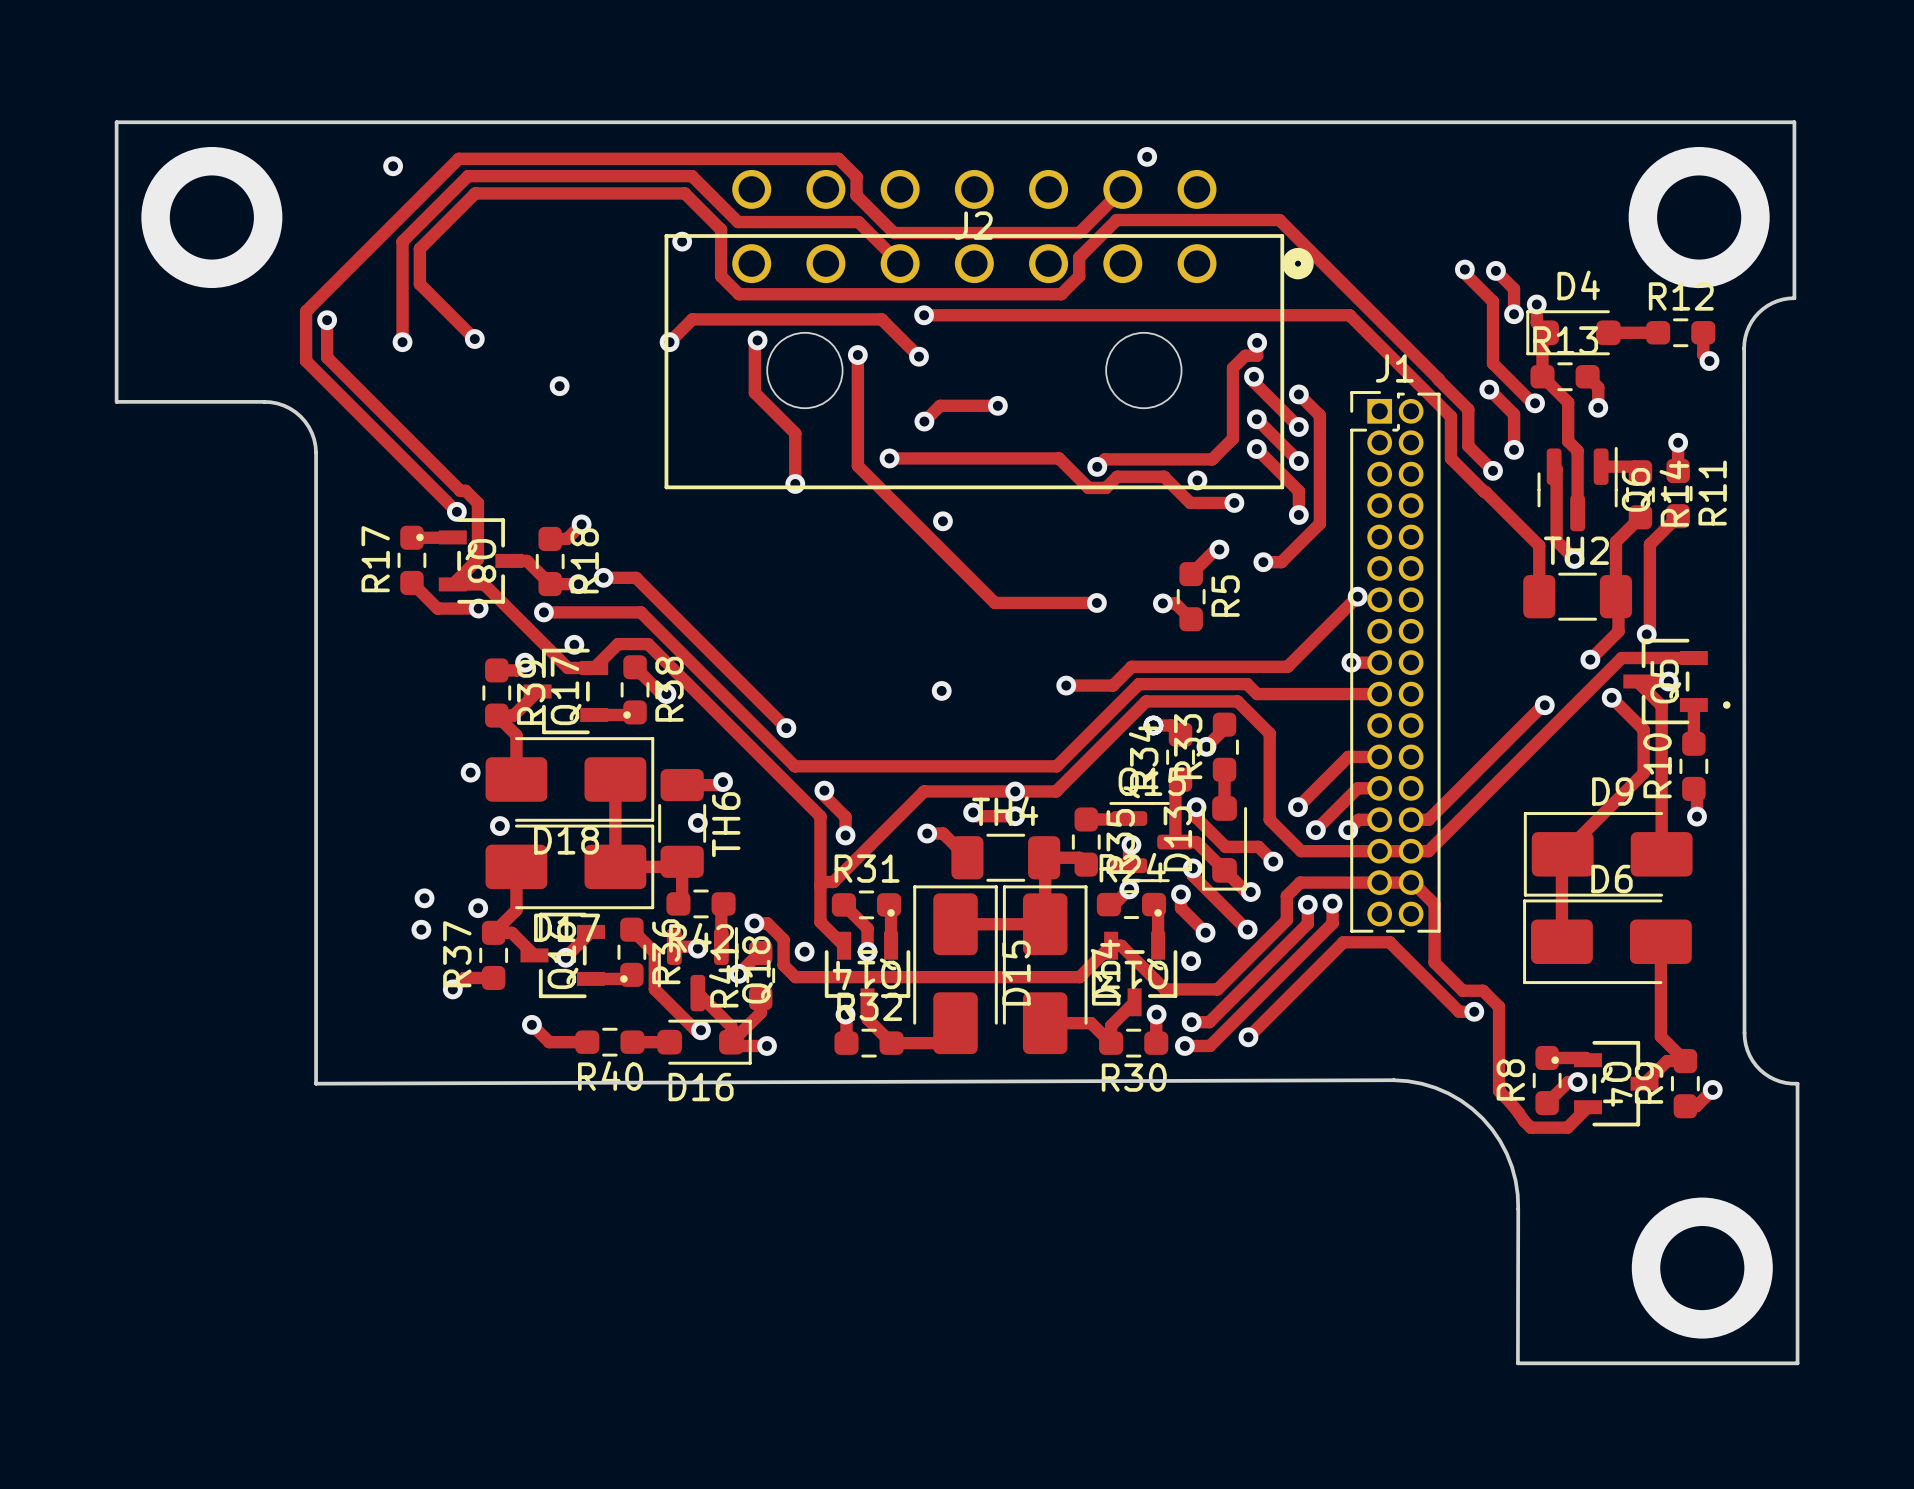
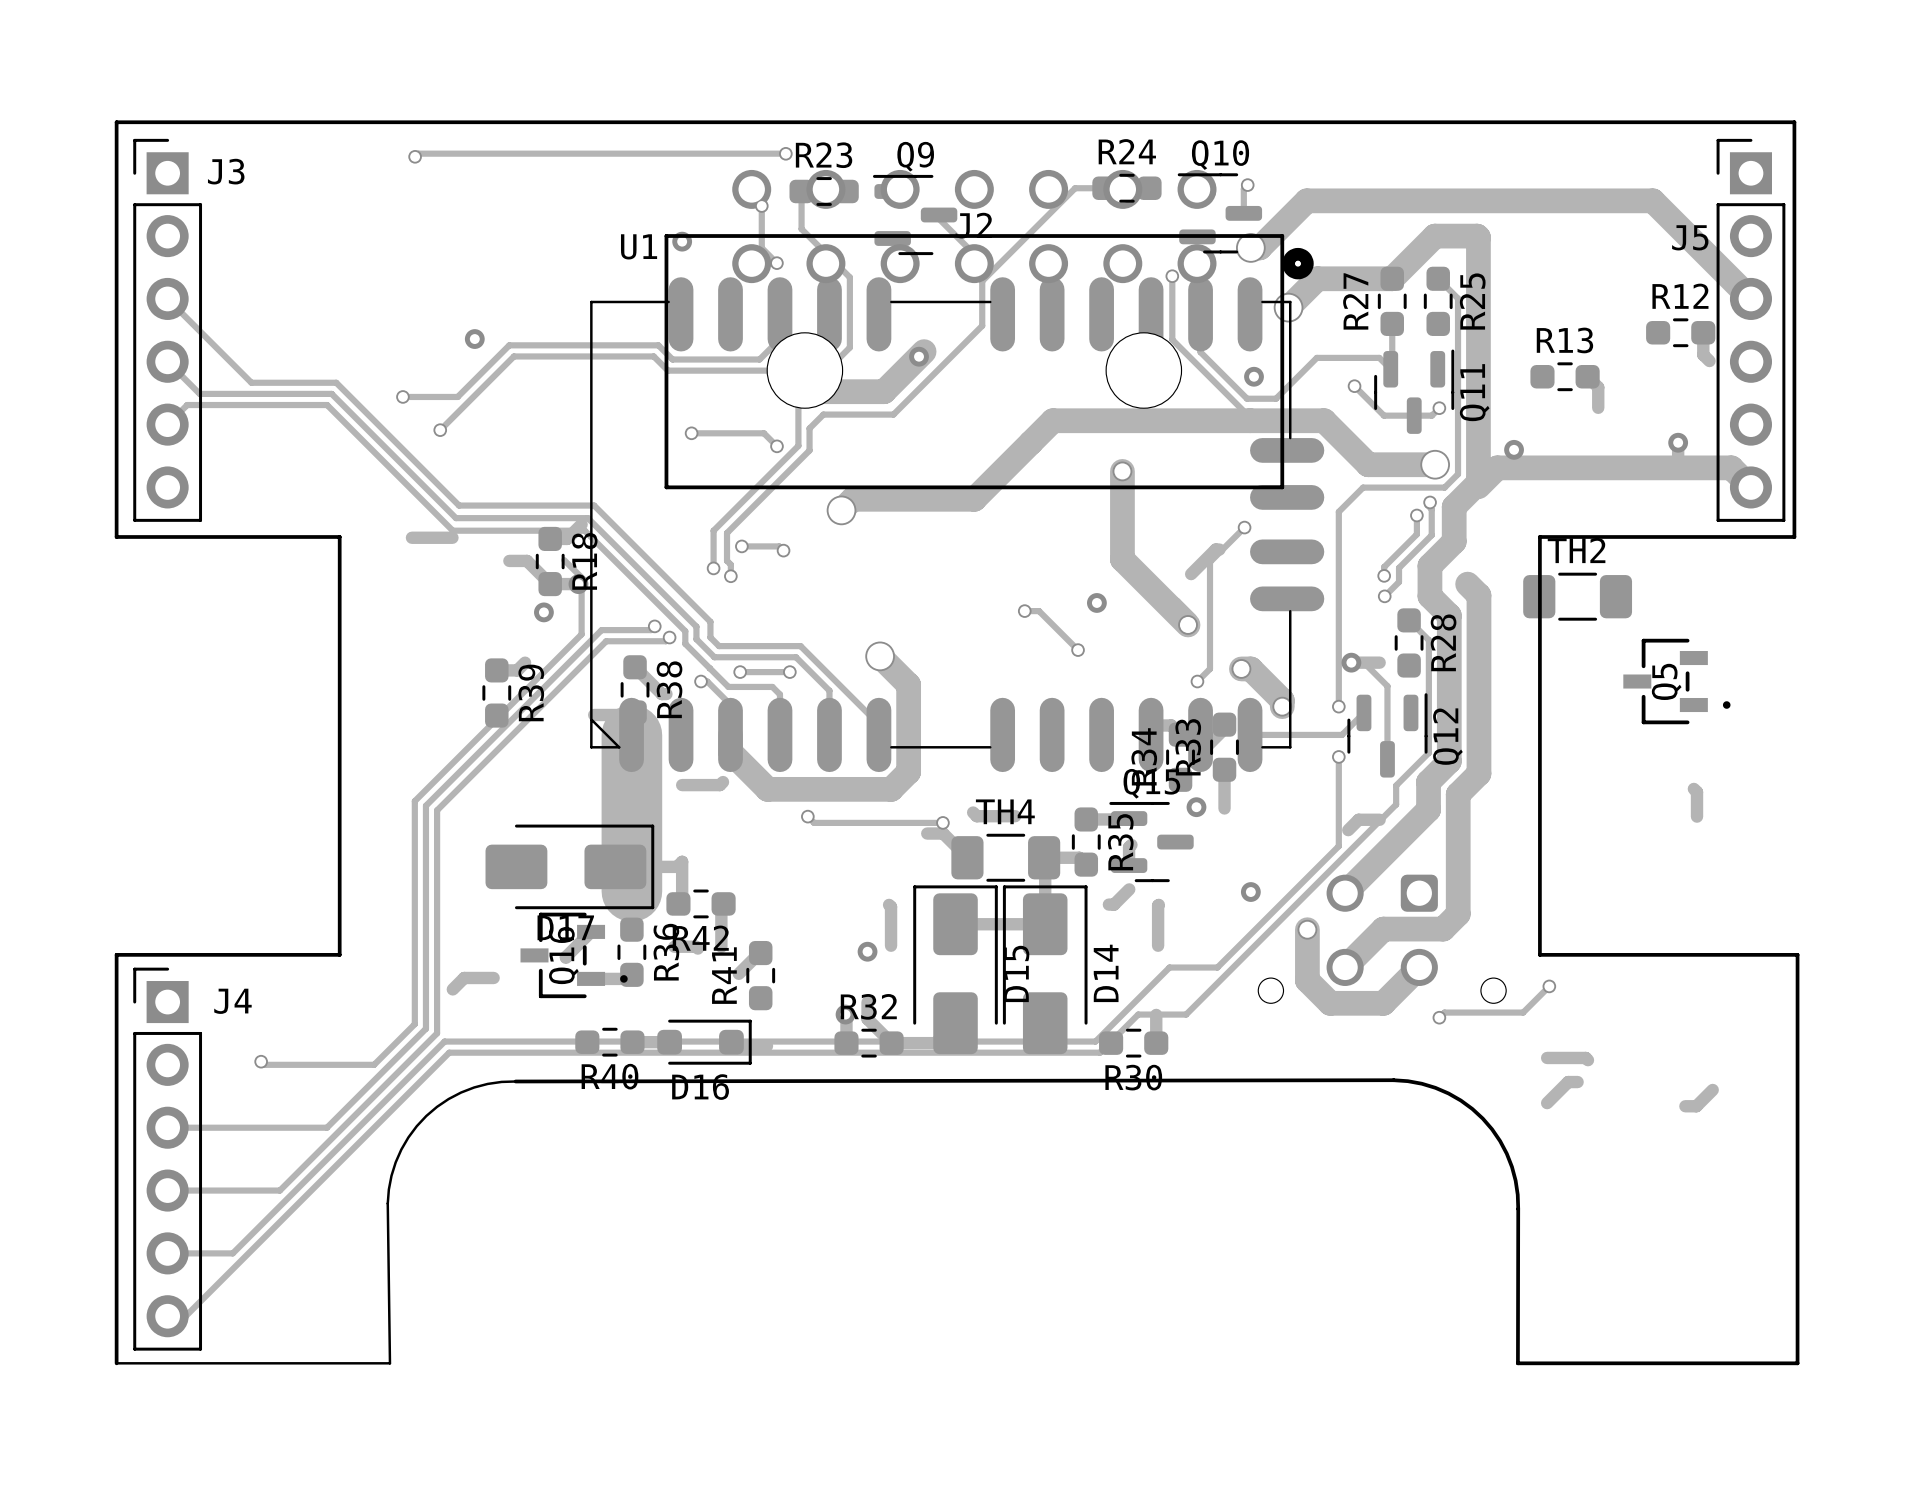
track: none -> (785, 153) (418, 153) (415, 156)
via: none -> (785, 153)
via: none -> (415, 156)
via: (1147, 156) -> none
via: (393, 166) -> none
track: none -> (1247, 185) (1243, 188) (1243, 213)
via: none -> (1247, 185)
track: none -> (1104, 188) (1075, 188) (982, 281) (982, 325) (893, 414) (823, 414) (809, 428) (809, 450) (727, 533) (727, 560) (730, 564) (730, 576)
track: (1122, 189) (1079, 233) (894, 233) (856, 195) (856, 176) (838, 158) (458, 158) (306, 311) (306, 361) (456, 511) -> none
track: none -> (801, 191) (801, 229) (849, 277) (849, 347) (837, 359) (824, 359) (798, 385) (798, 445) (713, 530) (713, 568)
R23: none -> (824, 191)
track: none -> (761, 206) (761, 248) (776, 263)
via: none -> (761, 206)
Q10: none -> (1219, 213)
Q9: none -> (915, 215)
track: none -> (939, 215) (939, 218) (968, 247)
via: (211, 217) -> none
via: (1699, 217) -> none
track: none -> (1250, 247) (1259, 247) (1306, 200) (1652, 200) (1750, 298)
via: none -> (1250, 247)
via: none -> (776, 263)
track: (900, 263) (858, 222) (738, 222) (692, 176) (468, 176) (402, 241) (402, 342) -> none
track: (1464, 269) (1464, 273) (1493, 301) (1493, 363) (1532, 403) (1535, 403) -> none
via: (1464, 269) -> none
track: (1495, 270) (1514, 288) (1514, 314) -> none
via: (1495, 270) -> none
track: none -> (1172, 276) (1172, 339) (1250, 417) (1250, 420)
via: none -> (1172, 276)
track: none -> (1438, 278) (1458, 298) (1458, 474) (1444, 487) (1363, 487) (1338, 511) (1338, 706)
track: none -> (167, 298) (251, 382) (336, 382) (459, 505) (594, 505) (710, 621) (710, 637) (719, 646) (800, 646) (878, 724) (878, 734)
board edge: (1794, 298) (1777, 300) (1762, 309) (1751, 321) (1744, 342) (1744, 1033) (1747, 1050) (1760, 1069) (1774, 1079) (1797, 1083) -> (1794, 298) (1794, 536) (1539, 536) (1539, 954) (1797, 954) (1797, 1083)
R27: none -> (1392, 301)
R25: none -> (1438, 301)
track: (1536, 304) (1536, 322) (1546, 332) (1542, 336) (1542, 376) (1568, 402) (1568, 441) (1577, 450) (1577, 513) -> none
via: (1536, 304) -> none
track: none -> (1288, 307) (1317, 278) (1392, 278) (1434, 236) (1478, 237) (1478, 482) (1454, 506) (1454, 541) (1429, 565) (1429, 596) (1449, 615) (1449, 761) (1428, 782) (1428, 809) (1345, 893)
via: none -> (1288, 307)
track: none -> (779, 314) (779, 339) (759, 359) (672, 359) (658, 345) (509, 345) (457, 396) (402, 396)
track: none -> (829, 314) (829, 339) (797, 370) (667, 370) (653, 356) (513, 356) (440, 430)
track: none -> (1200, 314) (1200, 352) (1247, 398) (1275, 398) (1316, 357) (1379, 357) (1390, 369) (1392, 323)
via: (1514, 314) -> none
track: (924, 315) (1349, 315) (1450, 416) (1450, 458) (1539, 545) (1539, 596) -> none
via: (924, 315) -> none
track: (327, 320) (327, 357) (460, 490) (465, 490) (477, 503) (477, 559) (452, 584) (484, 584) (567, 667) (594, 667) (618, 644) (648, 644) (820, 816) (820, 922) (844, 945) -> none
via: (327, 320) -> none
J3: none -> (167, 330)
J5: none -> (1750, 330)
D4: (1573, 332) -> none
track: (1608, 332) (1658, 332) -> none
track: (474, 339) (419, 284) (419, 248) (475, 193) (684, 193) (721, 229) (721, 276) (739, 294) (1061, 294) (1079, 276) (1079, 257) (1116, 220) (1279, 220) (1468, 409) (1468, 446) (1493, 470) -> none
track: (757, 340) (754, 343) (754, 392) (795, 433) (795, 483) -> none
via: (757, 340) -> none
via: (402, 342) -> none
track: (669, 342) (692, 319) (881, 319) (919, 356) -> none
via: (669, 342) -> none
track: (1257, 342) (1257, 355) (1245, 355) (1232, 368) (1232, 438) (1212, 459) (1104, 459) (1097, 466) -> none
via: (1257, 342) -> none
track: none -> (924, 351) (884, 391) (824, 391)
track: (857, 355) (857, 465) (994, 602) (1096, 602) -> none
via: (857, 355) -> none
track: none -> (167, 361) (199, 393) (331, 393) (455, 518) (587, 518) (696, 626) (696, 639) (714, 657) (796, 657) (829, 690) (829, 734)
via: (1709, 361) -> none
track: (1254, 376) (1254, 382) (1298, 427) -> none
via: (559, 386) -> none
track: none -> (1354, 386) (1384, 415) (1431, 415) (1439, 408)
via: none -> (1354, 386)
track: (1489, 389) (1514, 414) (1514, 449) -> none
via: (1489, 389) -> none
Q11: none -> (1414, 391)
track: (1298, 394) (1319, 415) (1319, 523) (1281, 562) (1263, 562) -> none
via: (1298, 394) -> none
via: none -> (402, 396)
board edge: (116, 401) (270, 402) (283, 405) (300, 416) (308, 427) (314, 439) (316, 452) (316, 1083) (1393, 1080) -> (116, 401) (116, 536) (339, 536) (339, 954) (116, 954) (116, 1363) (389, 1363) (387, 1203) (391, 1175) (395, 1162) (408, 1137) (426, 1115) (437, 1106) (461, 1092) (487, 1083) (515, 1081) (1393, 1080)
via: (1535, 403) -> none
track: (997, 405) (940, 405) (924, 421) -> none
via: (997, 405) -> none
via: (1598, 407) -> none
via: none -> (1439, 408)
track: (1256, 419) (1298, 461) -> none
via: (1256, 419) -> none
via: (924, 421) -> none
track: none -> (167, 424) (187, 405) (327, 405) (452, 530) (584, 530) (685, 631) (685, 643) (728, 686) (772, 686) (779, 694) (779, 734)
via: (1298, 427) -> none
via: none -> (440, 430)
track: none -> (691, 433) (763, 433) (776, 446)
via: none -> (691, 433)
via: none -> (776, 446)
track: (1256, 449) (1298, 491) (1298, 514) -> none
via: (1256, 449) -> none
track: (889, 458) (1059, 458) (1088, 487) (1105, 487) (1117, 476) (1163, 476) (1190, 502) (1234, 502) -> none
via: (889, 458) -> none
via: (1298, 461) -> none
track: none -> (1435, 464) (1368, 464) (1324, 420) (1052, 420) (974, 499) (852, 499) (841, 510)
via: none -> (1435, 464)
via: (1097, 466) -> none
track: (1554, 466) (1556, 469) (1556, 541) (1574, 558) -> none
via: (1493, 470) -> none
track: none -> (1122, 471) (1122, 559) (1188, 624)
via: none -> (1122, 471)
via: (1197, 480) -> none
via: (795, 483) -> none
track: none -> (1478, 486) (1497, 467) (1731, 467) (1750, 487)
Q6: (1577, 489) -> none
R11: (1678, 493) -> none
R14: (1640, 494) -> none
via: (1234, 502) -> none
track: none -> (1430, 502) (1427, 505) (1431, 509) (1431, 535) (1399, 567) (1399, 582) (1384, 596)
via: none -> (1430, 502)
via: none -> (841, 510)
via: (456, 511) -> none
via: (1298, 514) -> none
track: none -> (1416, 515) (1416, 534) (1384, 567) (1384, 575)
via: none -> (1416, 515)
track: (1678, 516) (1649, 544) (1649, 631) (1646, 634) -> none
track: (1640, 517) (1615, 541) (1615, 596) (1618, 599) (1618, 631) (1590, 659) -> none
via: (942, 521) -> none
via: (581, 524) -> none
U1: none -> (957, 524)
track: none -> (1244, 527) (1210, 562) (1210, 668) (1197, 681)
via: none -> (1244, 527)
track: none -> (741, 546) (779, 546) (783, 550)
via: none -> (741, 546)
via: (1219, 549) -> none
via: none -> (783, 550)
via: (1574, 558) -> none
R17: (411, 560) -> none
Q8: (469, 560) -> none
track: none -> (564, 560) (581, 577) (581, 634) (414, 801) (414, 1024) (374, 1064) (264, 1064) (261, 1061)
via: (1263, 562) -> none
via: none -> (713, 568)
via: none -> (1384, 575)
via: none -> (730, 576)
track: (603, 577) (636, 577) (786, 728) -> none
via: (603, 577) -> none
track: (411, 582) (437, 608) (478, 608) -> none
track: none -> (1467, 584) (1478, 595) (1478, 773) (1458, 794) (1458, 914) (1443, 929) (1383, 929) (1345, 967)
R5: (1191, 596) -> none
track: (1357, 596) (1287, 666) (1131, 666) (1112, 685) (1066, 685) -> none
via: (1357, 596) -> none
via: none -> (1384, 596)
via: (1162, 603) -> none
via: (478, 608) -> none
track: none -> (1024, 611) (1039, 611) (1078, 650)
via: none -> (1024, 611)
track: (543, 612) (640, 612) (794, 766) (1056, 766) (1138, 684) (1247, 684) (1257, 694) (1379, 694) -> none
track: none -> (1409, 620) (1428, 640) (1428, 752) (1396, 785) (1396, 804) (1186, 1014) (1138, 1014) (1100, 1052) (449, 1052) (185, 1316) (167, 1316)
via: none -> (1188, 624)
track: none -> (654, 626) (651, 630) (601, 630) (425, 805) (425, 1028) (326, 1127) (167, 1127)
via: none -> (654, 626)
via: (1646, 634) -> none
track: none -> (669, 637) (665, 641) (606, 641) (437, 810) (437, 1033) (279, 1190) (167, 1190)
via: none -> (669, 637)
R28: none -> (1409, 642)
via: (574, 644) -> none
via: none -> (1078, 650)
track: none -> (880, 656) (908, 684) (908, 771) (891, 789) (767, 789) (730, 752) (730, 704) (707, 681) (701, 681)
via: none -> (880, 656)
track: (1693, 658) (1621, 658) (1428, 851) (1301, 851) (1269, 819) (1269, 733) (1237, 701) (1146, 701) (1056, 791) (924, 791) (833, 882) (824, 882) (820, 885) -> none
via: (1590, 659) -> none
J1: (1395, 661) -> none
via: (525, 662) -> none
track: none -> (1367, 665) (1387, 686) (1387, 759)
track: none -> (1241, 668) (1250, 668) (1282, 700) (1282, 706)
via: none -> (1241, 668)
track: none -> (740, 672) (789, 672)
via: none -> (740, 672)
via: none -> (789, 672)
via: none -> (701, 681)
via: none -> (1197, 681)
track: (1668, 681) (1637, 681) (1661, 705) (1661, 854) -> none
via: (1668, 681) -> none
via: (1066, 685) -> none
via: (941, 690) -> none
track: (537, 691) (513, 715) (496, 715) (516, 735) (516, 779) -> none
Q17: (577, 691) -> none
via: (666, 694) -> none
track: (1611, 697) (1643, 729) (1643, 773) (1561, 855) (1561, 941) -> none
via: (1611, 697) -> none
track: (1544, 705) (1428, 819) (1411, 819) -> none
via: (1544, 705) -> none
track: (1693, 705) (1693, 743) -> none
via: none -> (1282, 706)
via: none -> (1338, 706)
track: none -> (1363, 712) (1341, 734) (1250, 734)
via: (1153, 725) -> none
via: (786, 728) -> none
track: none -> (631, 735) (631, 891)
Q12: none -> (1387, 735)
via: (1206, 746) -> none
track: none -> (1338, 756) (1338, 846) (1217, 967) (1169, 967) (1095, 1041) (444, 1041) (232, 1253) (167, 1253)
via: none -> (1338, 756)
track: (1379, 756) (1348, 756) (1297, 807) -> none
R10: (1693, 766) -> none
via: (470, 772) -> none
D18: (569, 779) -> none
track: (1180, 779) (1175, 784) (1175, 842) (1196, 842) (1246, 892) (1250, 892) -> none
via: (723, 782) -> none
track: (1379, 788) (1357, 788) (1315, 830) -> none
track: (824, 790) (824, 795) (845, 817) (845, 835) -> none
via: (824, 790) -> none
via: (1015, 791) -> none
track: (1196, 807) (1196, 817) (1225, 846) (1258, 846) (1273, 861) -> none
via: (1297, 807) -> none
via: (973, 812) -> none
track: none -> (807, 816) (814, 822) (942, 822)
via: none -> (807, 816)
via: (1015, 816) -> none
via: (1697, 816) -> none
via: (697, 822) -> none
TH6: (682, 823) -> none
via: (499, 826) -> none
via: (1315, 830) -> none
via: (1348, 830) -> none
via position: (927, 833) -> (942, 822)
via: (845, 835) -> none
D13: (1224, 843) -> none
via: (1131, 844) -> none
D9: (1608, 854) -> none
via: (1273, 861) -> none
track: (516, 866) (516, 910) (493, 932) (511, 932) (534, 955) -> none
track: (1192, 868) (1192, 875) (1247, 929) -> none
via: (1192, 868) -> none
via: (1129, 889) -> none
track: (1181, 894) (1181, 908) (1205, 932) -> none
via: (1181, 894) -> none
via: (424, 898) -> none
track: (1332, 903) (1332, 923) (1210, 1045) (1184, 1045) -> none
via: (1332, 903) -> none
track: (843, 904) (867, 928) (867, 951) -> none
R31: (866, 904) -> none
R24 position: (1131, 904) -> (1126, 188)
track: (1307, 904) (1307, 923) (1209, 1022) (1191, 1022) -> none
via: (1307, 904) -> none
via: (478, 908) -> none
track: (754, 923) (767, 923) (783, 939) (783, 965) (795, 977) (1079, 977) (1111, 945) (1121, 945) (1165, 989) (1217, 989) (1286, 920) (1286, 896) (1300, 882) (1412, 882) (1434, 904) (1434, 962) (1462, 990) (1482, 990) (1499, 1006) (1499, 1091) (1530, 1127) (1567, 1127) (1587, 1107) -> none
via: (754, 923) -> none
via: (421, 929) -> none
track: (631, 929) (654, 952) (654, 989) (695, 1030) (701, 1030) -> none
via: (1247, 929) -> none
track: none -> (1307, 929) (1307, 980) (1330, 1003) (1383, 1003) (1419, 967)
via: none -> (1307, 929)
via: (1205, 932) -> none
part: none -> (1382, 938)
D6: (1607, 941) -> none
track: (1660, 941) (1660, 1036) (1685, 1061) (1667, 1061) (1644, 1083) -> none
via: (697, 948) -> none
via: (804, 951) -> none
R37: (493, 955) -> none
via: (565, 957) -> none
via: (1191, 961) -> none
Q14: (867, 962) -> none
Q13: (1134, 962) -> none
Q18: (697, 969) -> none
via: (738, 973) -> none
track: none -> (1549, 986) (1523, 1012) (1444, 1012) (1439, 1017)
via: none -> (1549, 986)
via: (452, 989) -> none
track: (697, 993) (731, 1026) (731, 1042) (760, 1012) (760, 998) -> none
track: (1134, 1002) (1111, 1025) (1111, 1043) (1091, 1023) (1045, 1023) -> none
track: (1474, 1011) (1459, 1011) (1389, 942) (1343, 942) (1248, 1037) -> none
via: (1474, 1011) -> none
via: (1156, 1014) -> none
via: none -> (1439, 1017)
via: (1191, 1022) -> none
track: (531, 1024) (549, 1042) (587, 1042) -> none
via: (531, 1024) -> none
via: (701, 1030) -> none
via: (1248, 1037) -> none
via: (767, 1045) -> none
via: (1184, 1045) -> none
via: none -> (261, 1061)
R8: (1547, 1080) -> none
via: (1577, 1082) -> none
Q4: (1604, 1083) -> none
R9: (1685, 1083) -> none
via: (1712, 1089) -> none
J4: none -> (167, 1159)
via: (1702, 1268) -> none

